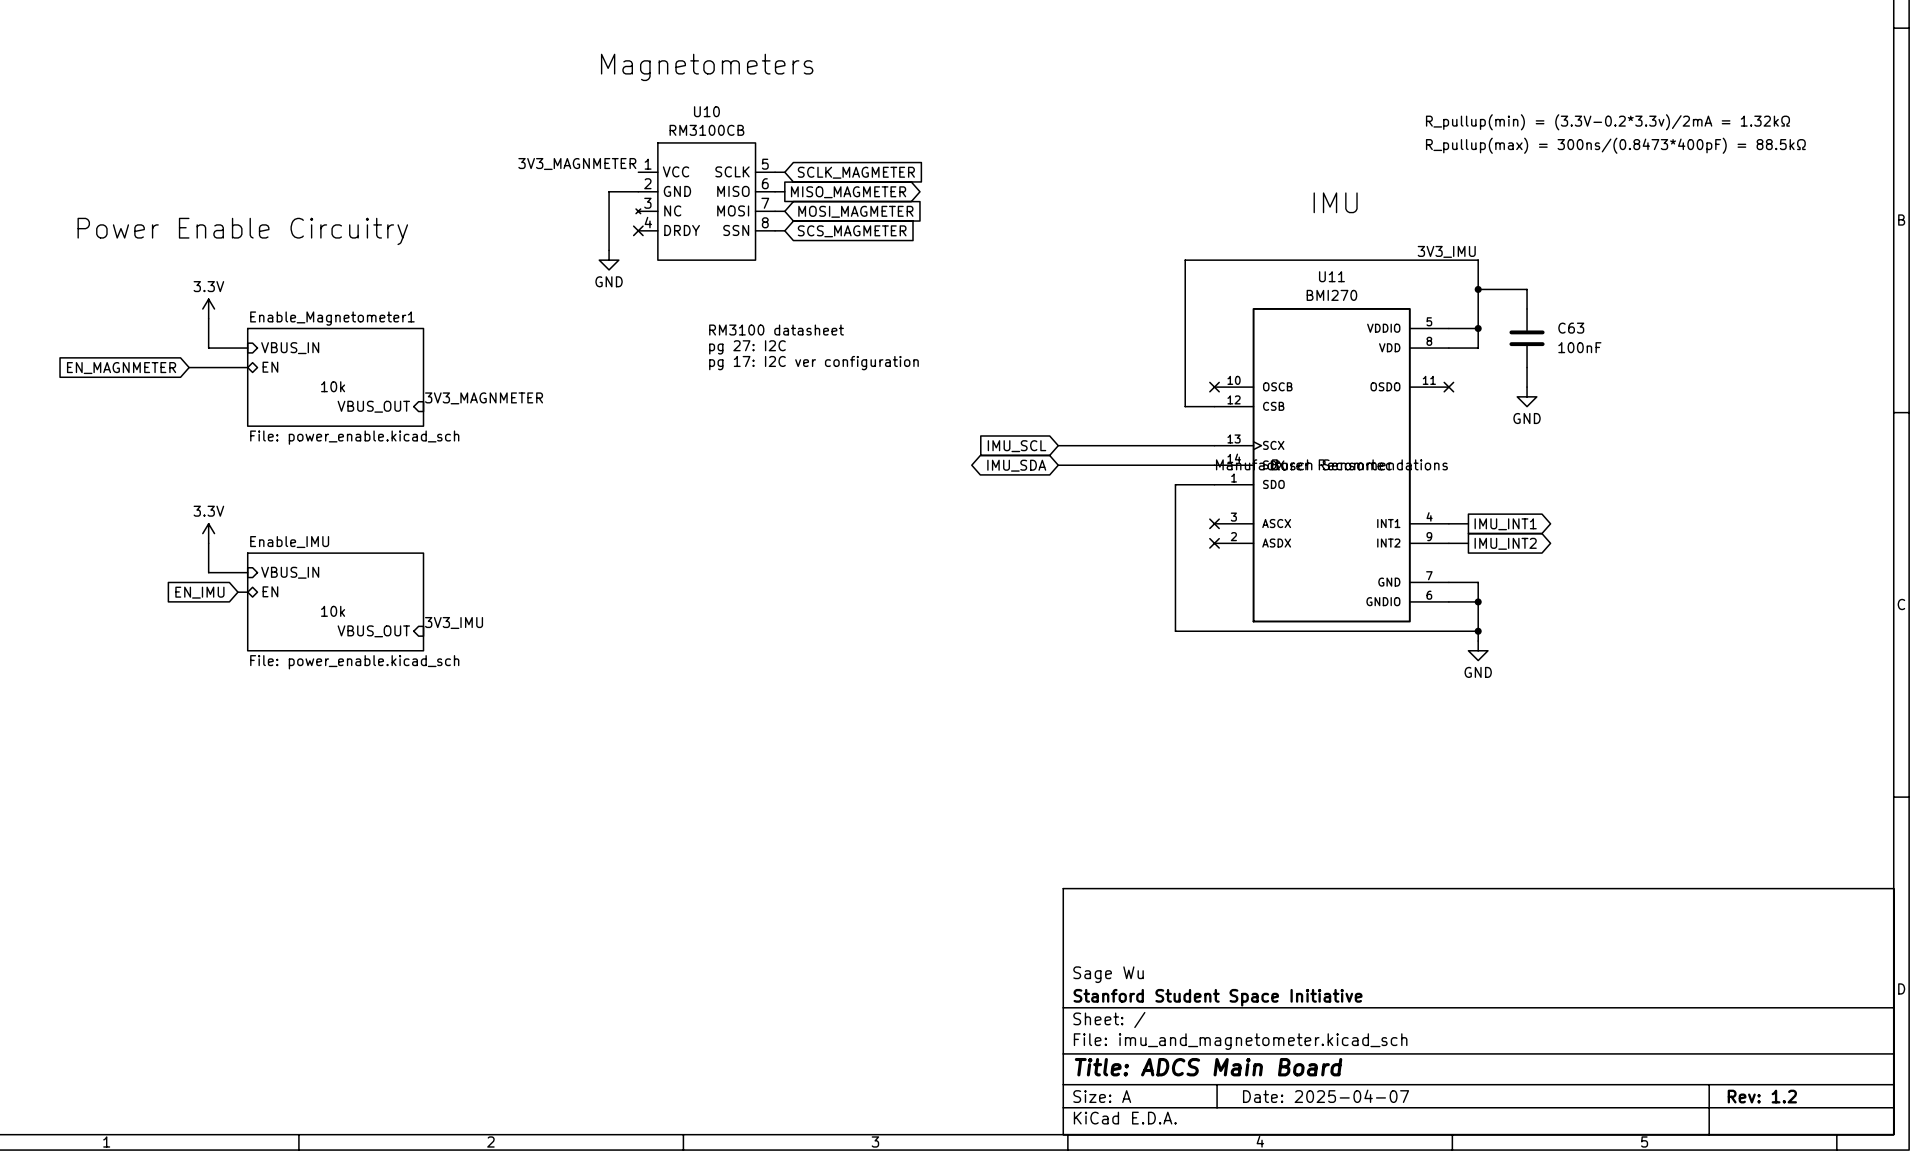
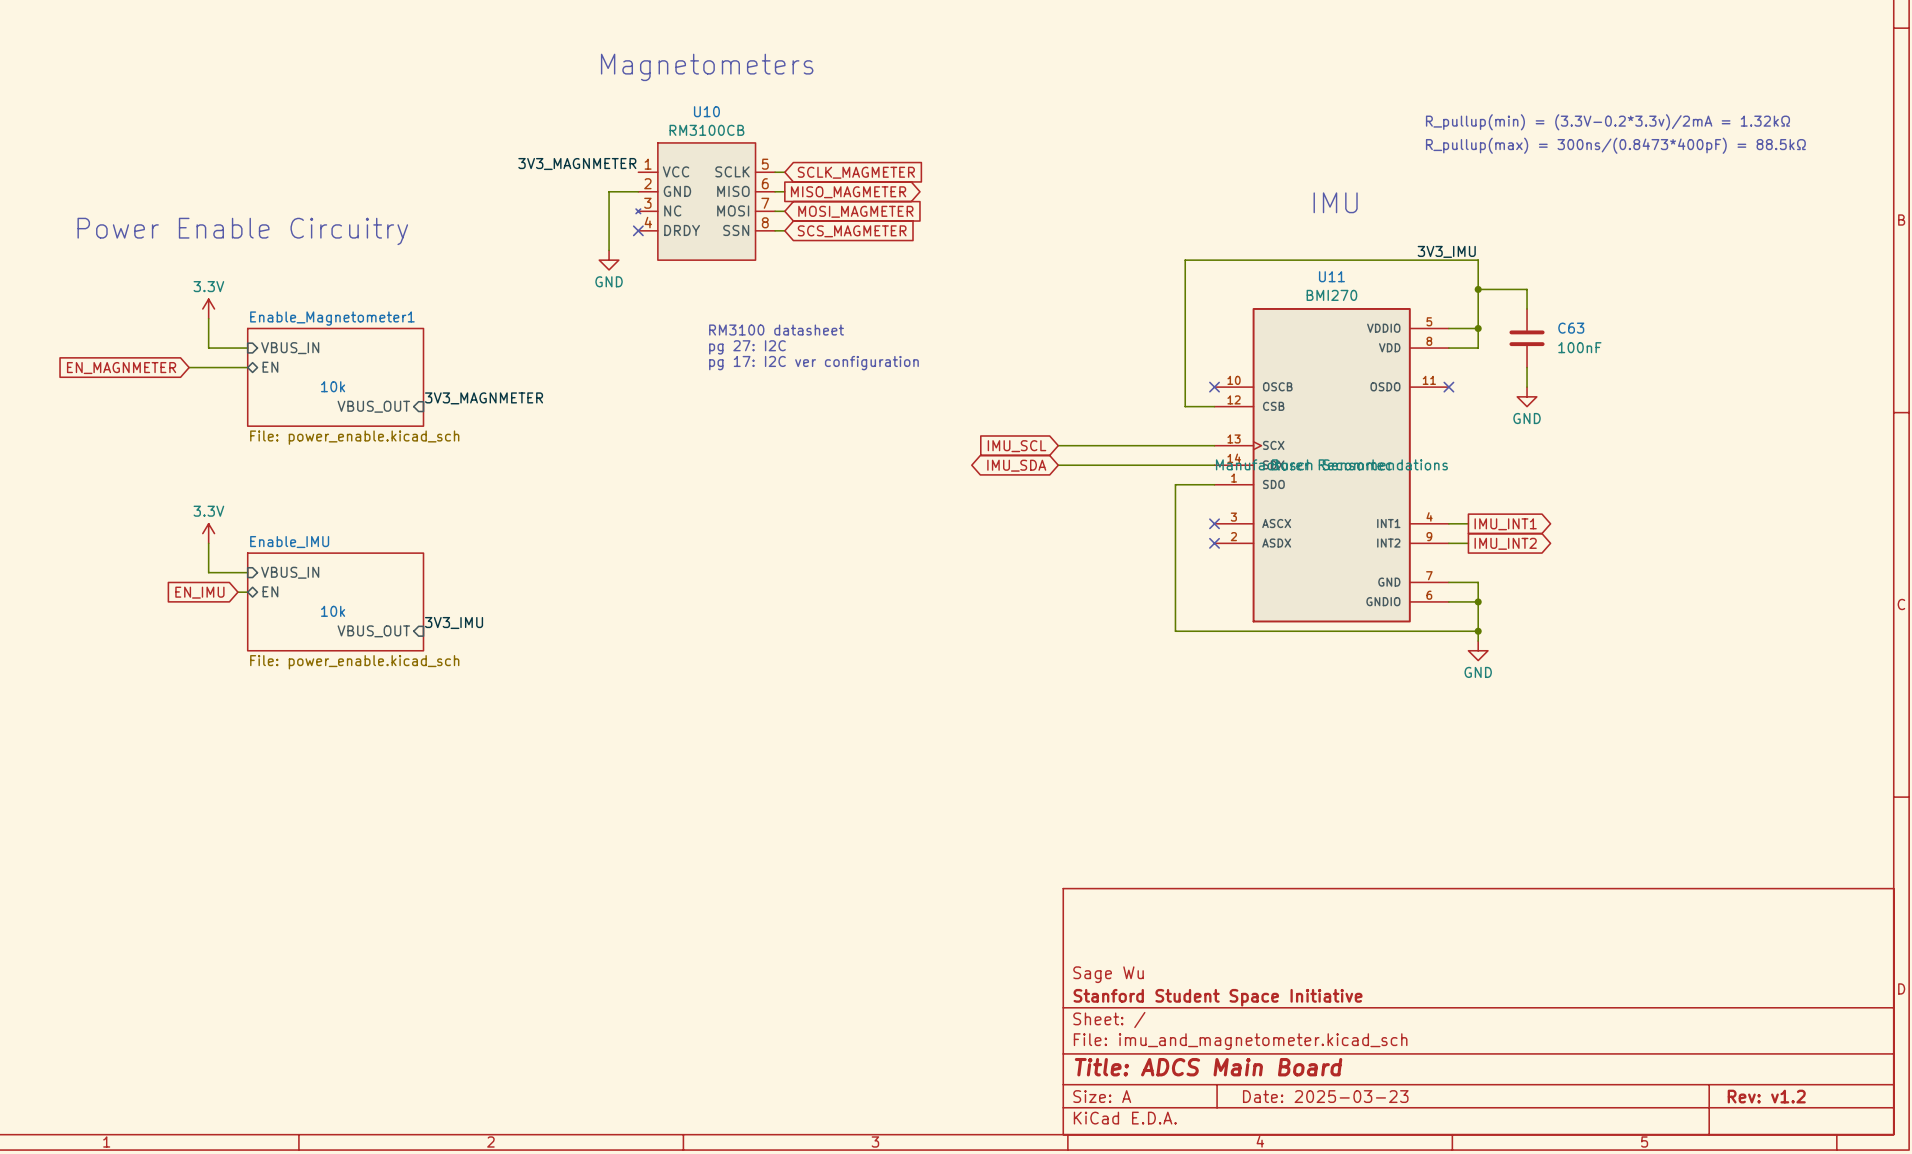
title block: Date: 2025-04-07 (1326, 1096) -> Date: 2025-03-23 (1325, 1096)
title block: Rev: 1.2 (1762, 1096) -> Rev: v1.2 (1766, 1096)

